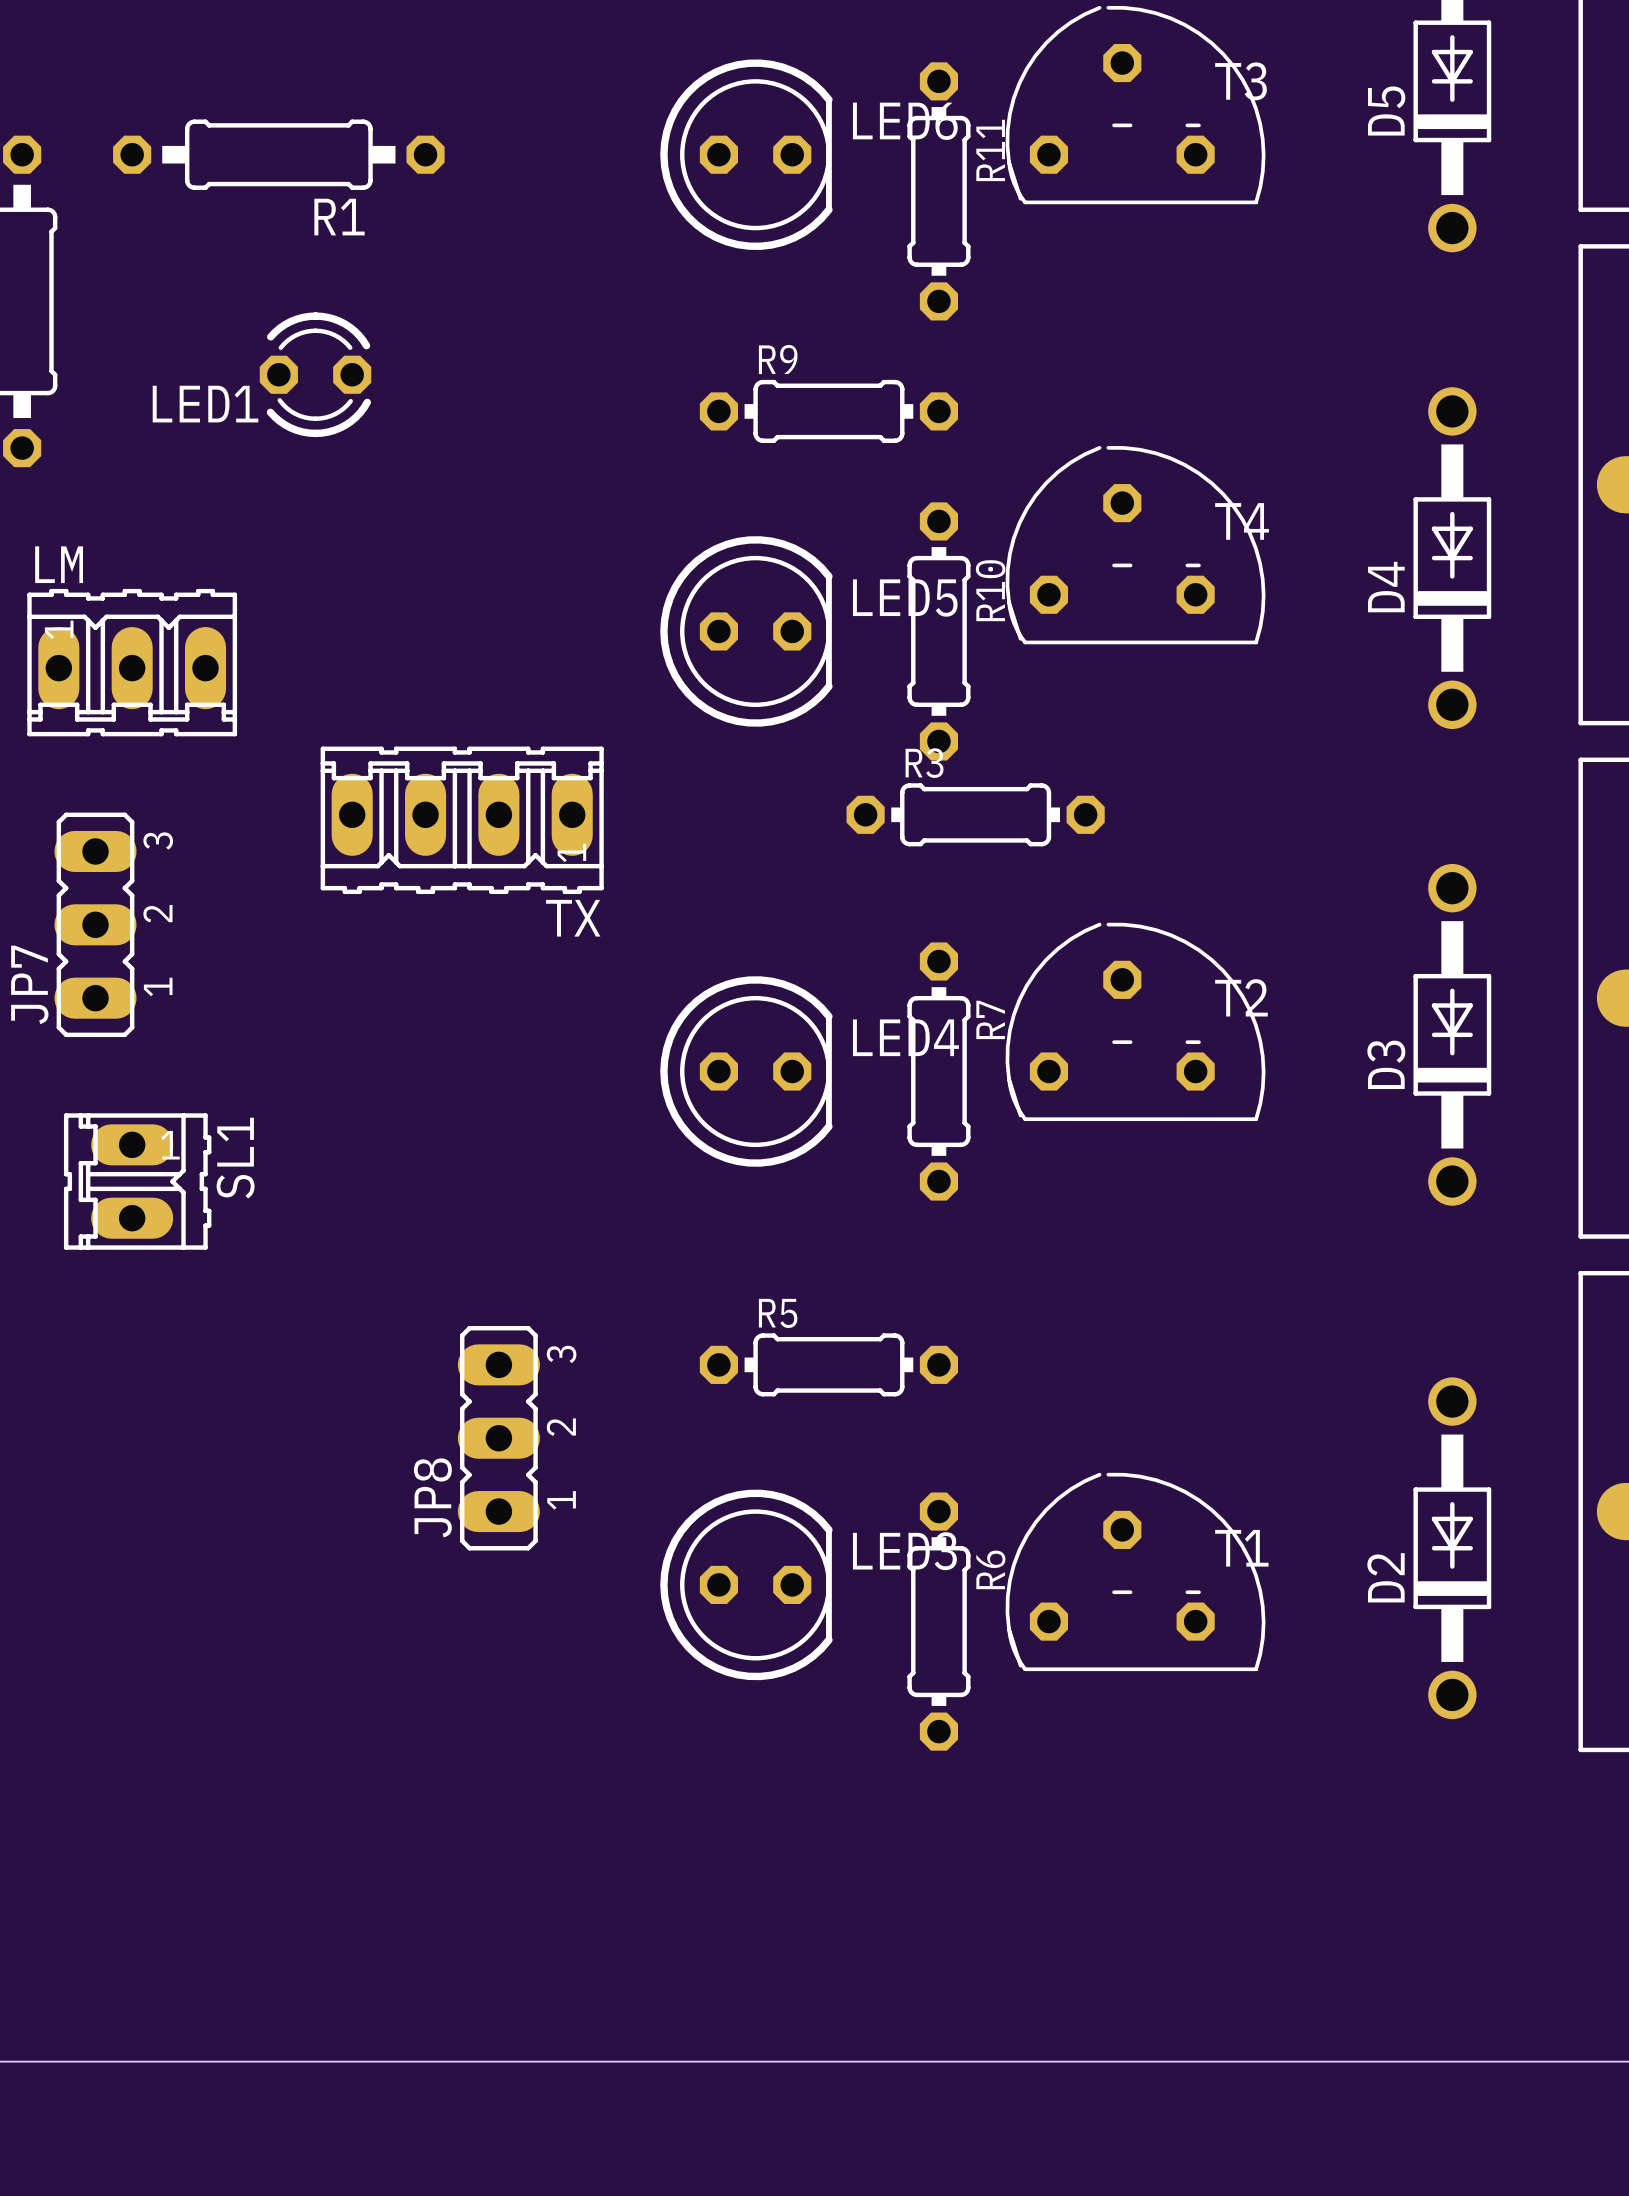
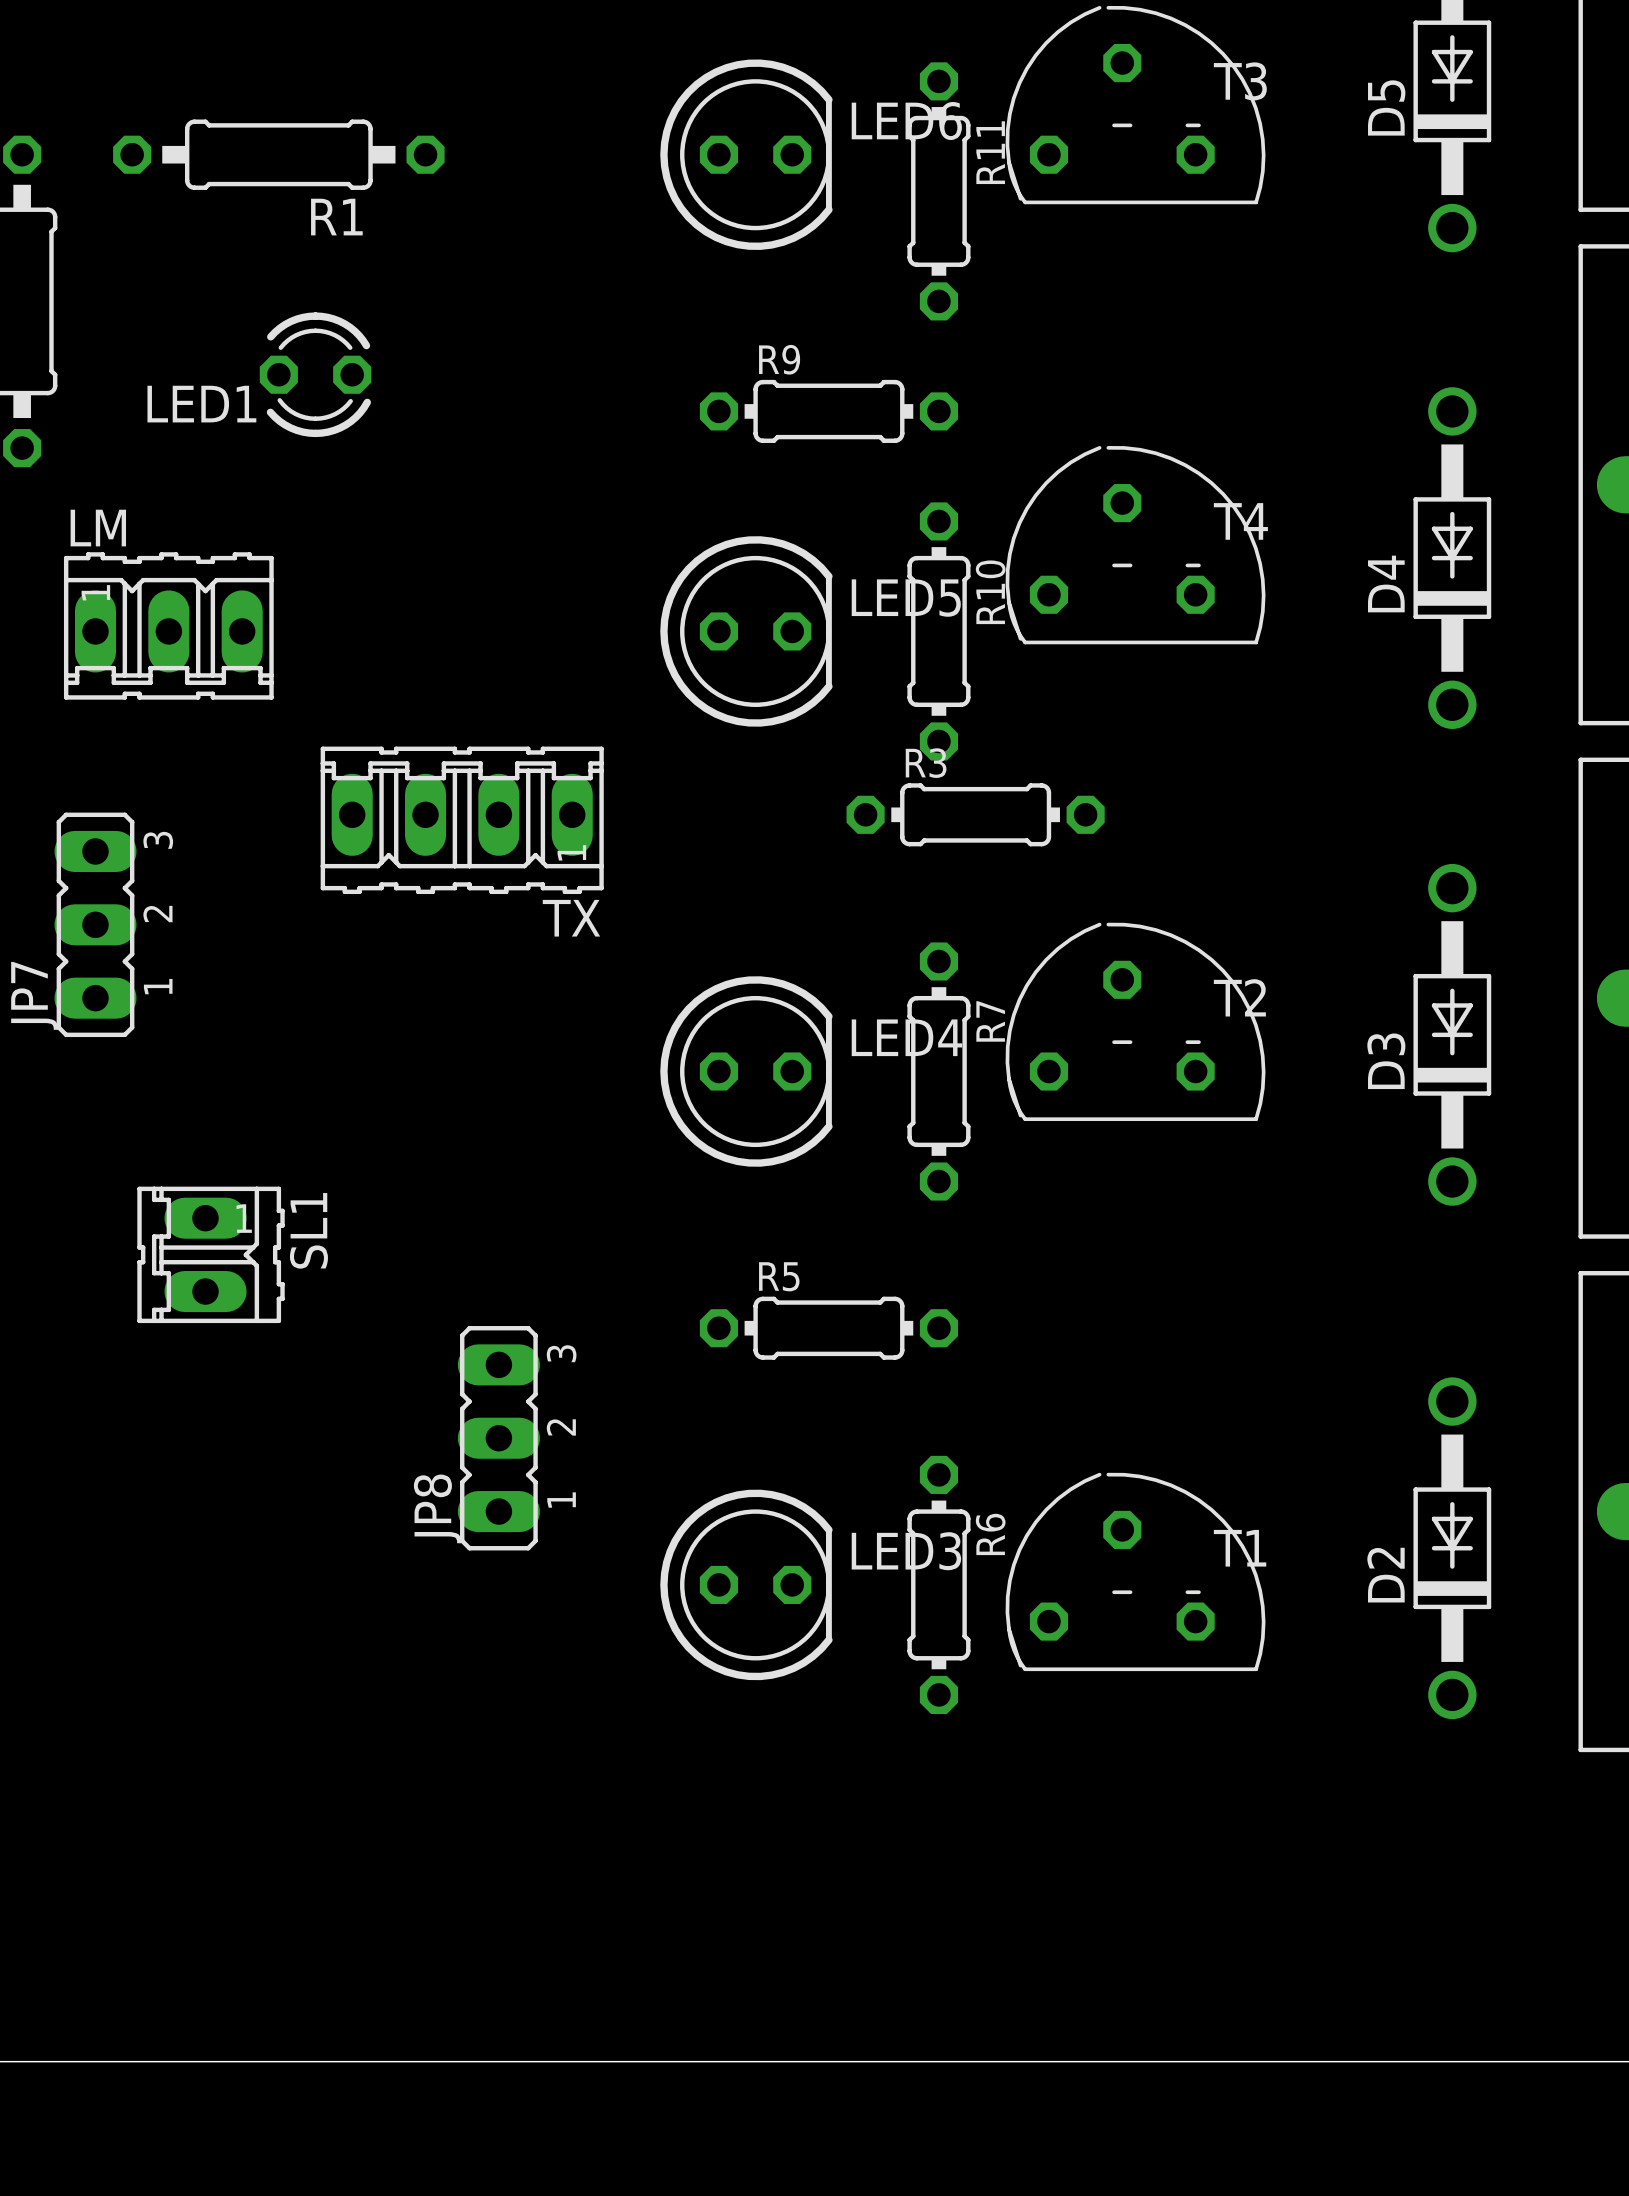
LM position: (132, 662) -> (168, 625)
SL1 position: (137, 1181) -> (211, 1254)
R5 position: (828, 1364) -> (828, 1328)
R6 position: (938, 1621) -> (938, 1584)

